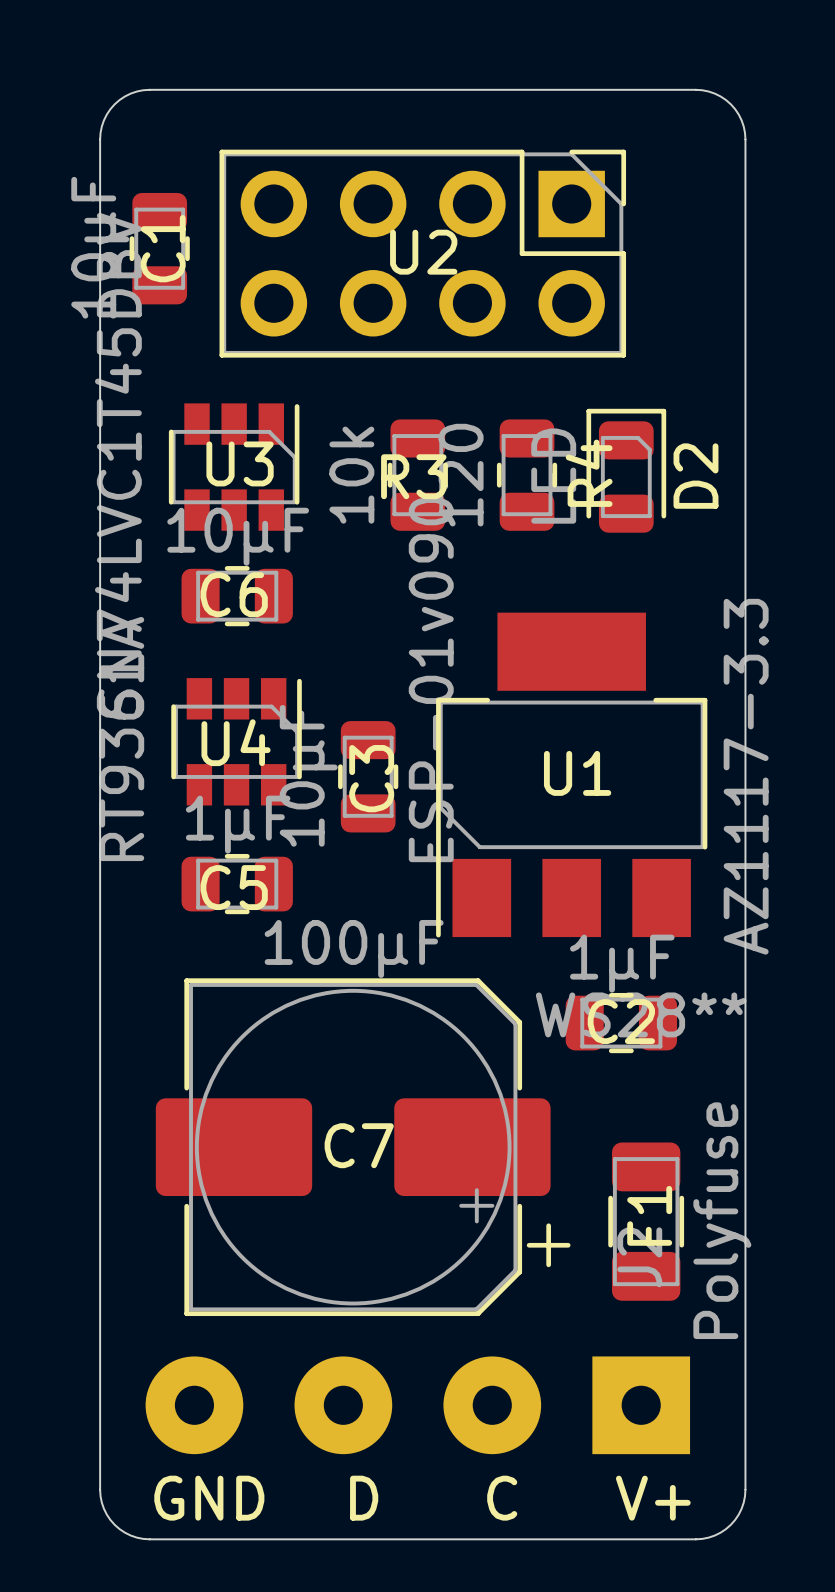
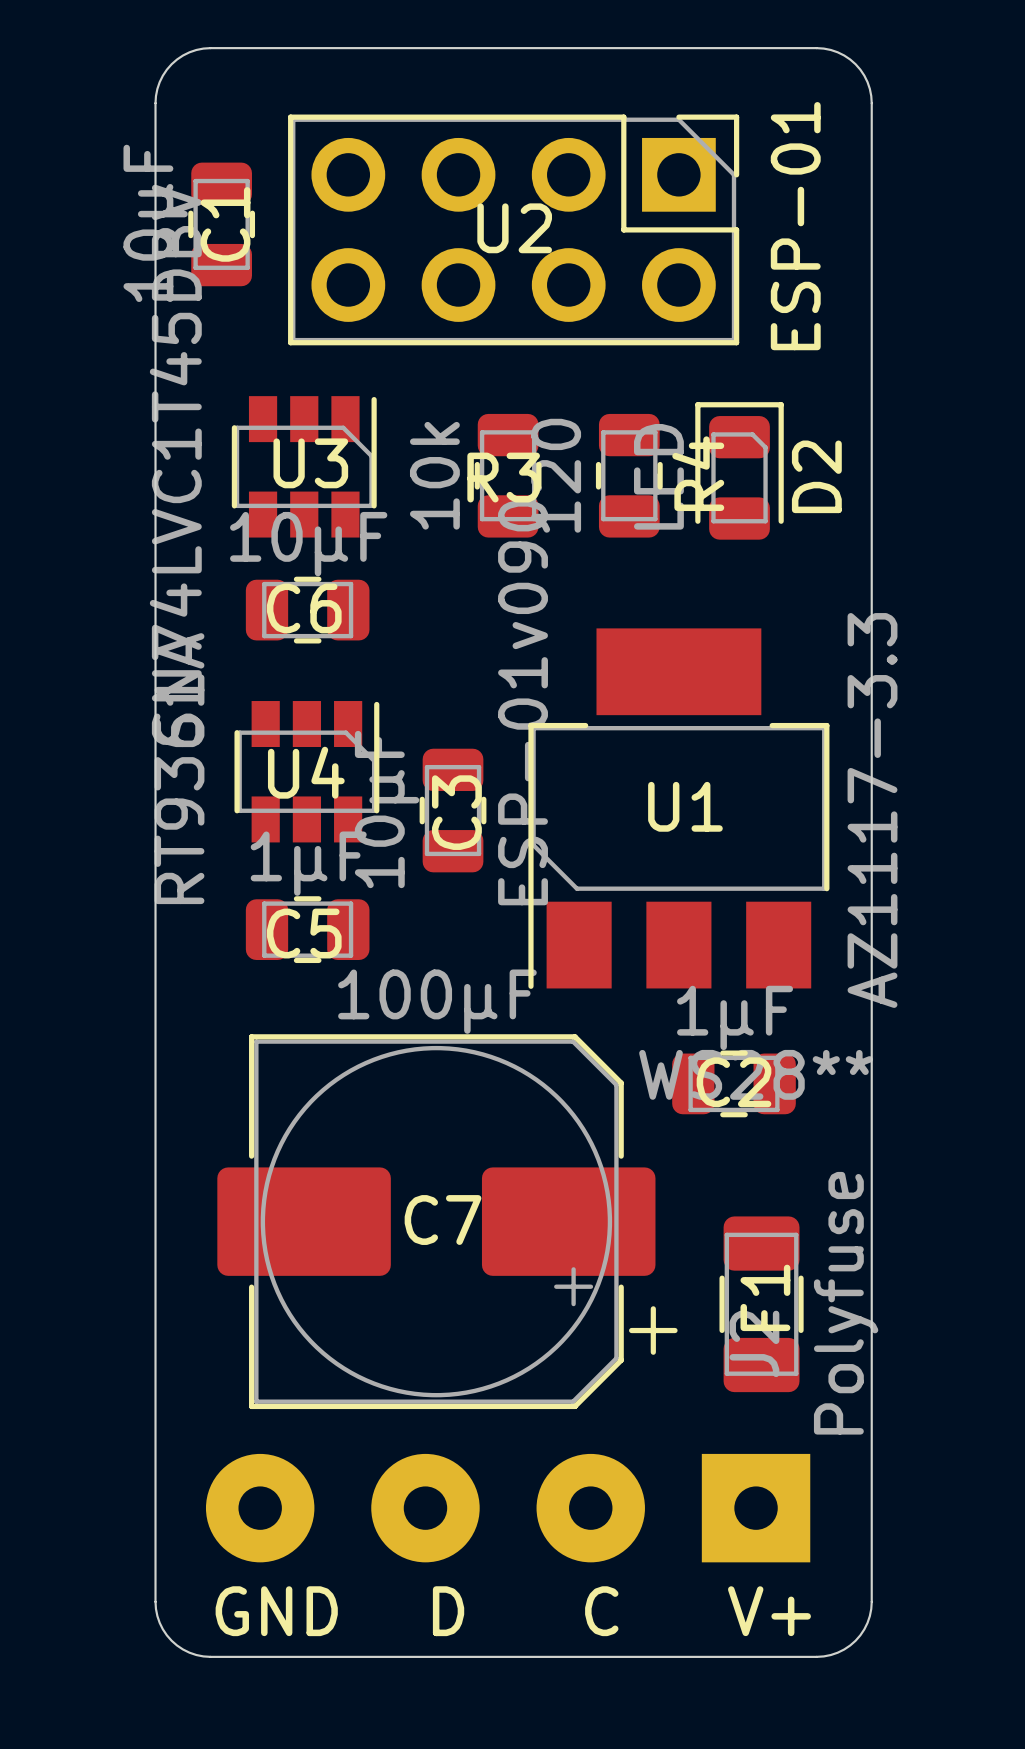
text: none -> ESP-01 (795, 226)

